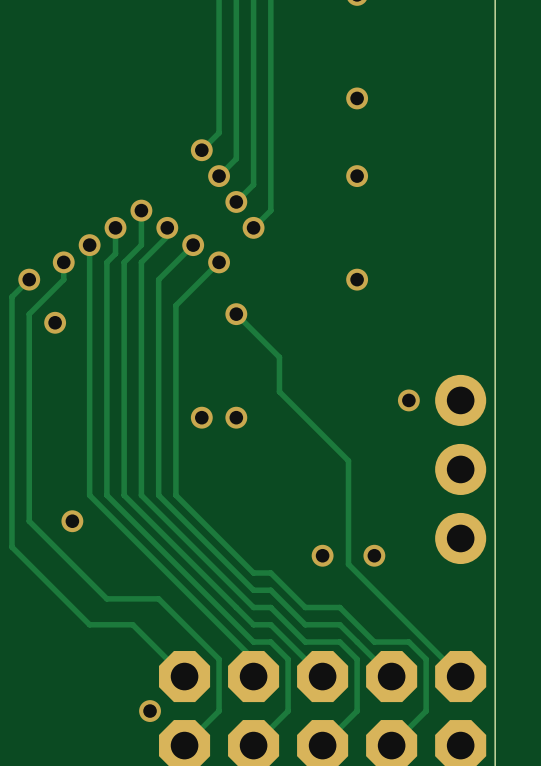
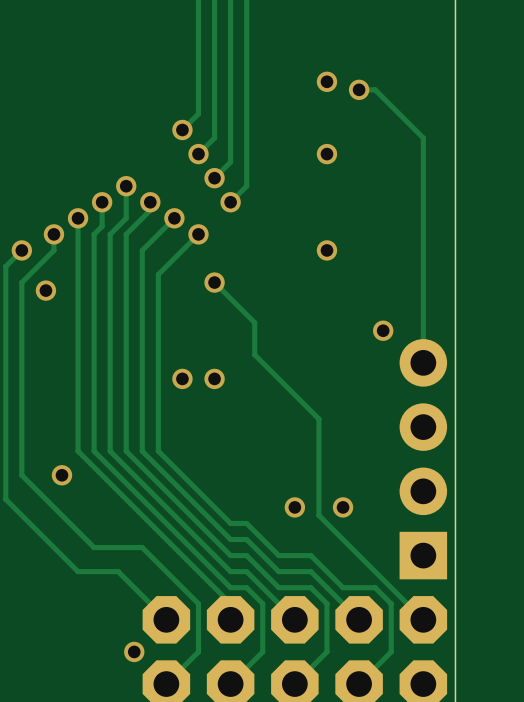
track: none -> (359, 89) (375, 89) (423, 138) (423, 362)
via: none -> (359, 89)
via position: (408, 400) -> (383, 330)
part: (460, 469) -> none
part: none -> (423, 459)

